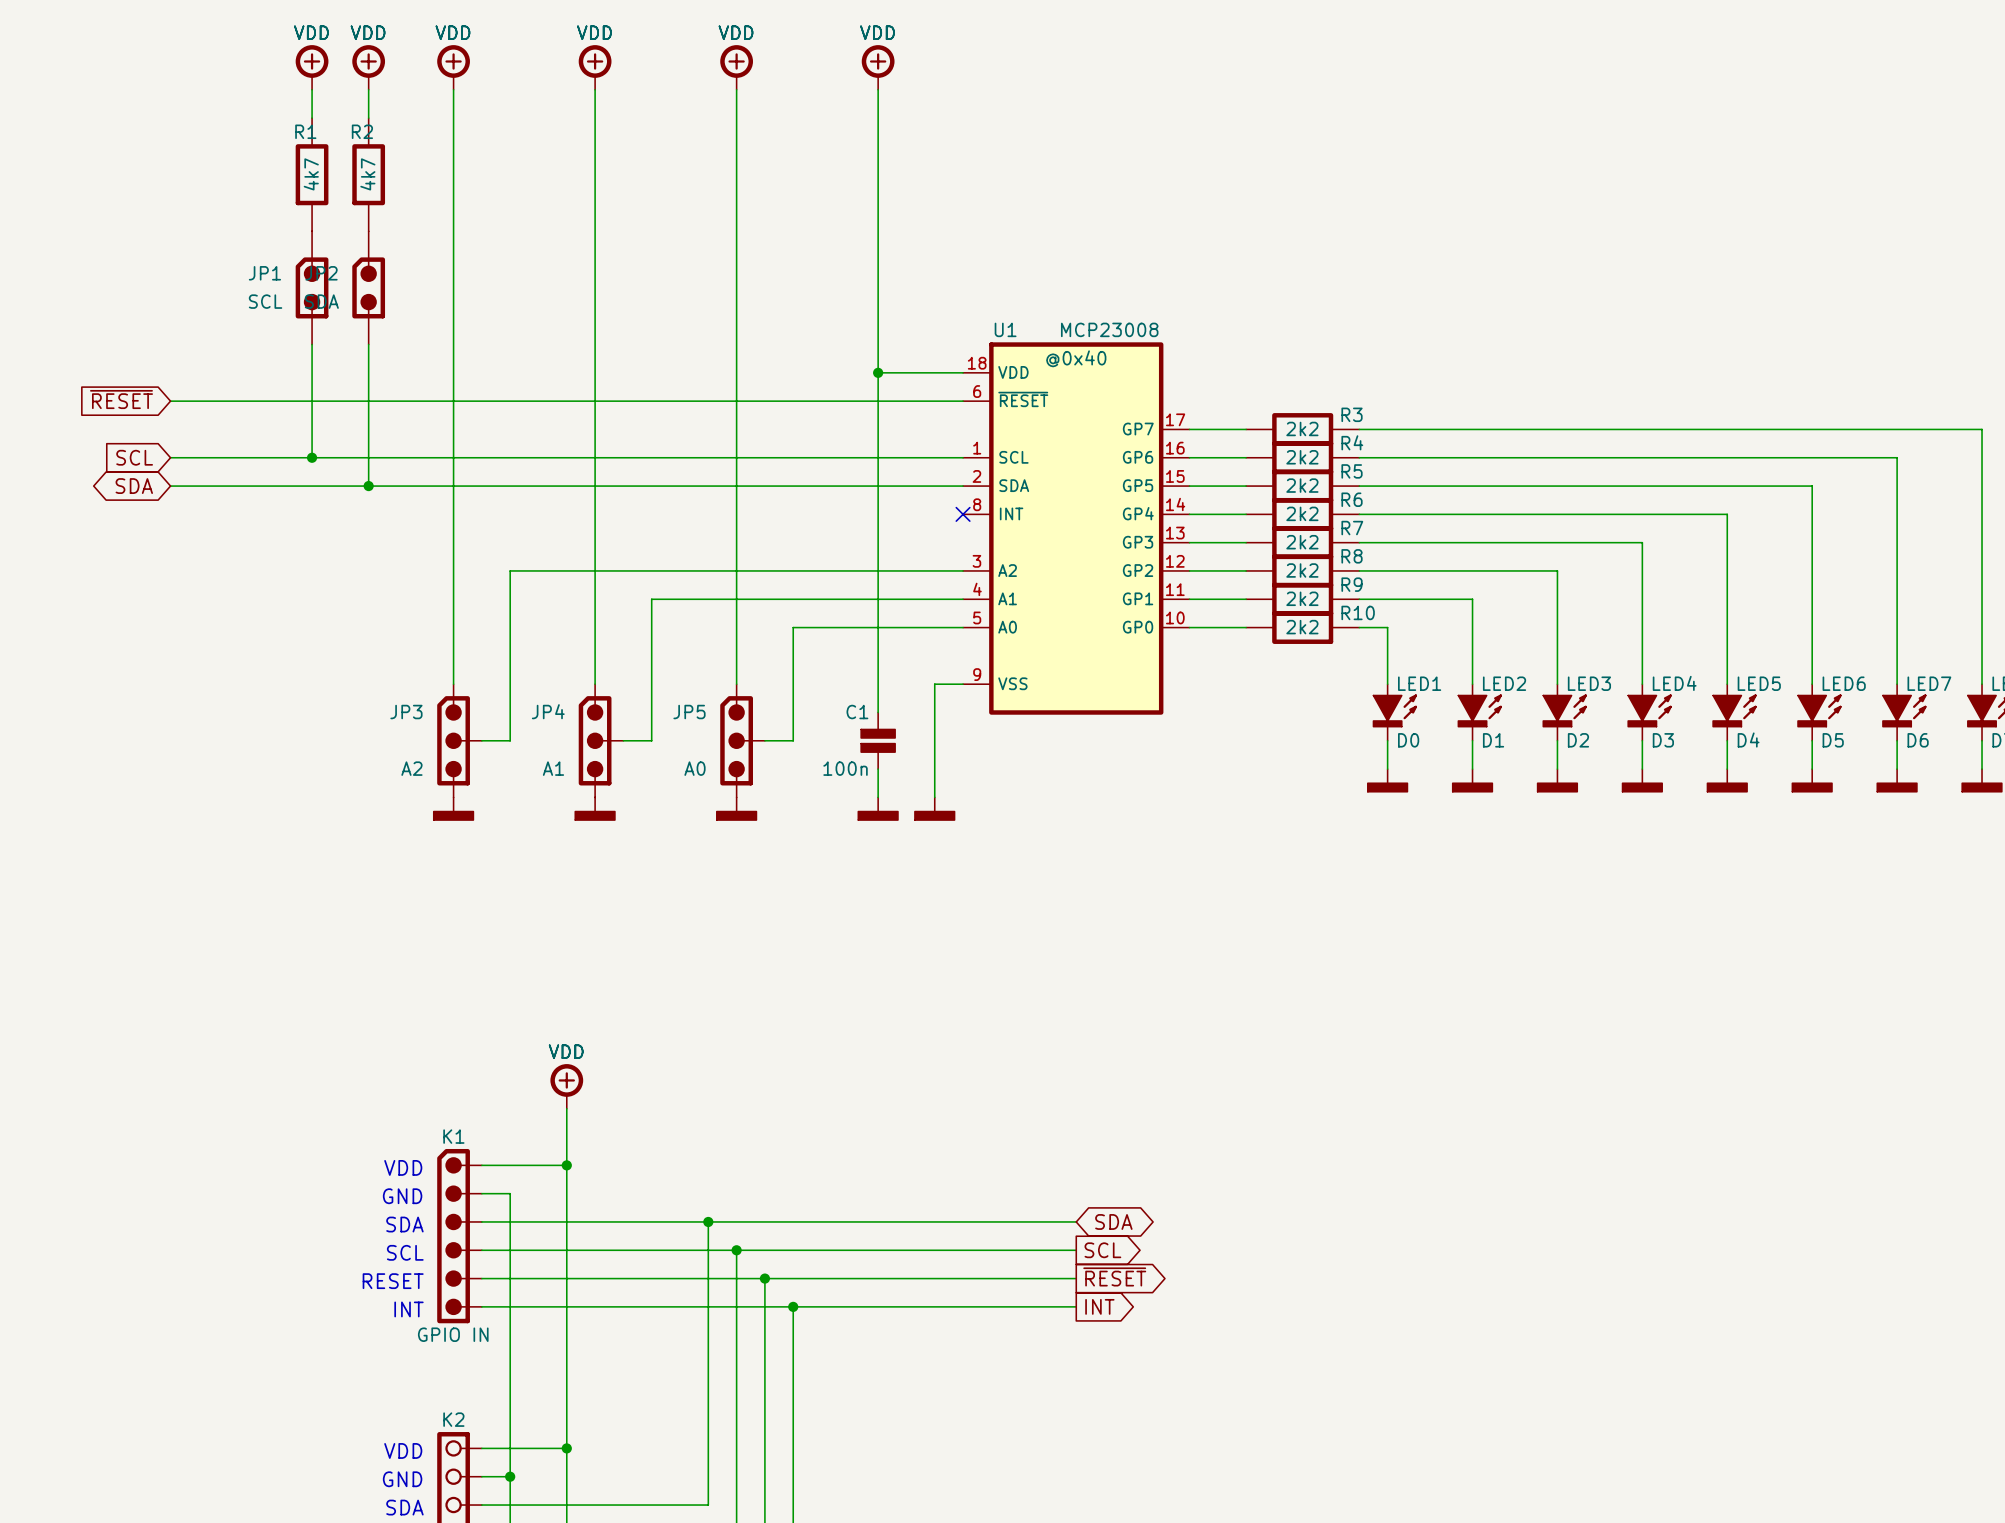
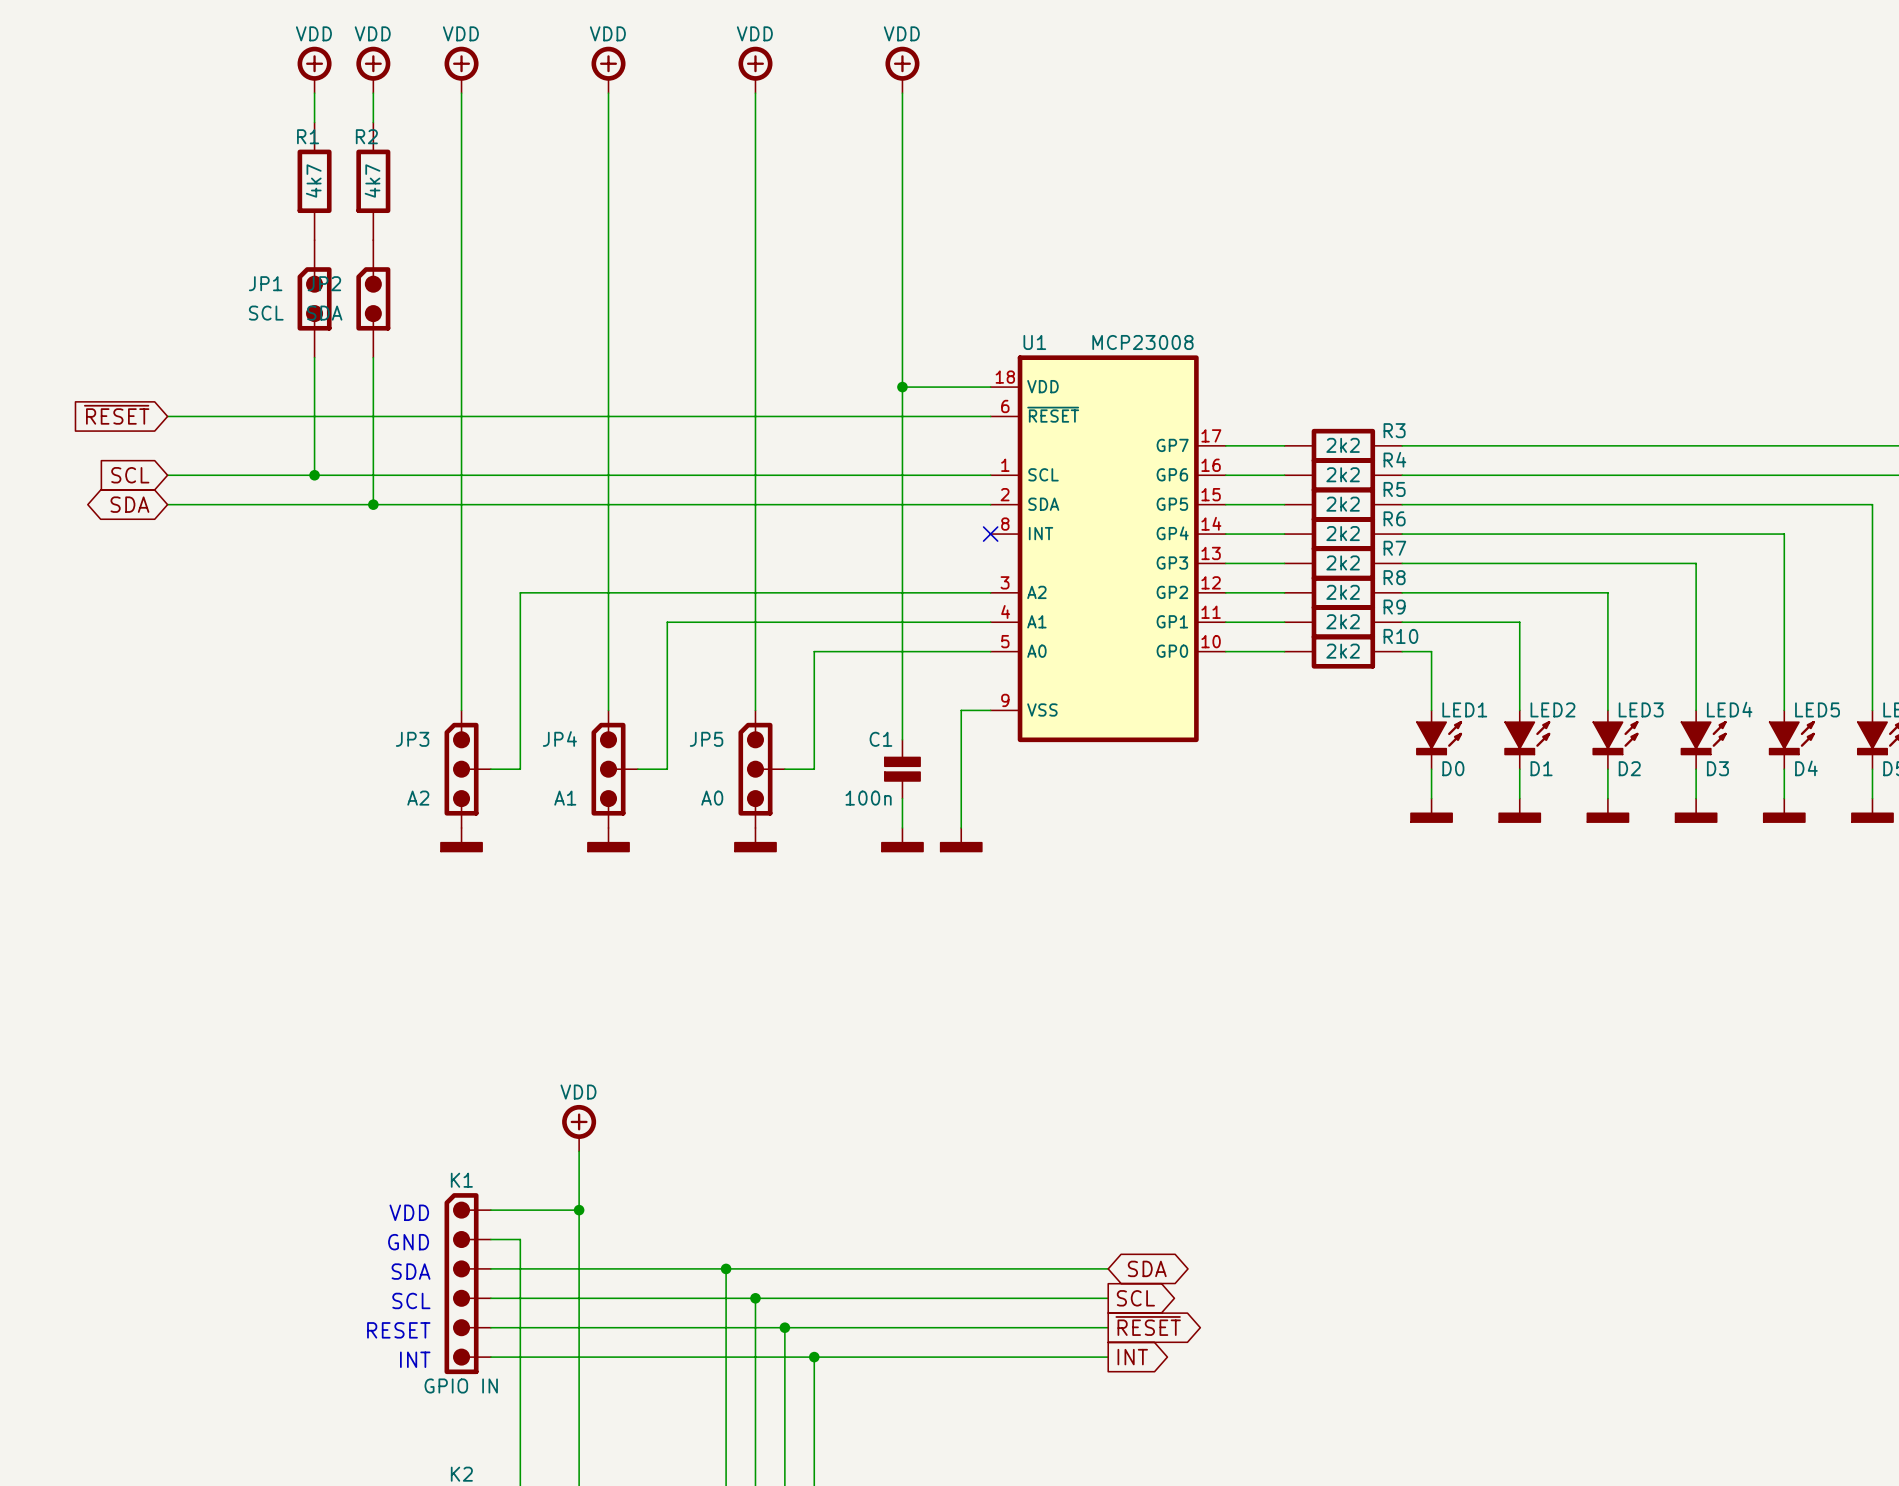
power symbol text: VDD (311, 32) -> none
power symbol text: VDD (368, 32) -> none
power symbol text: VDD (452, 32) -> none
power symbol text: VDD (594, 32) -> none
power symbol text: VDD (736, 32) -> none
power symbol text: VDD (877, 32) -> none
U1 text: @0x40 (1076, 358) -> none
power symbol text: VDD (566, 1051) -> none

